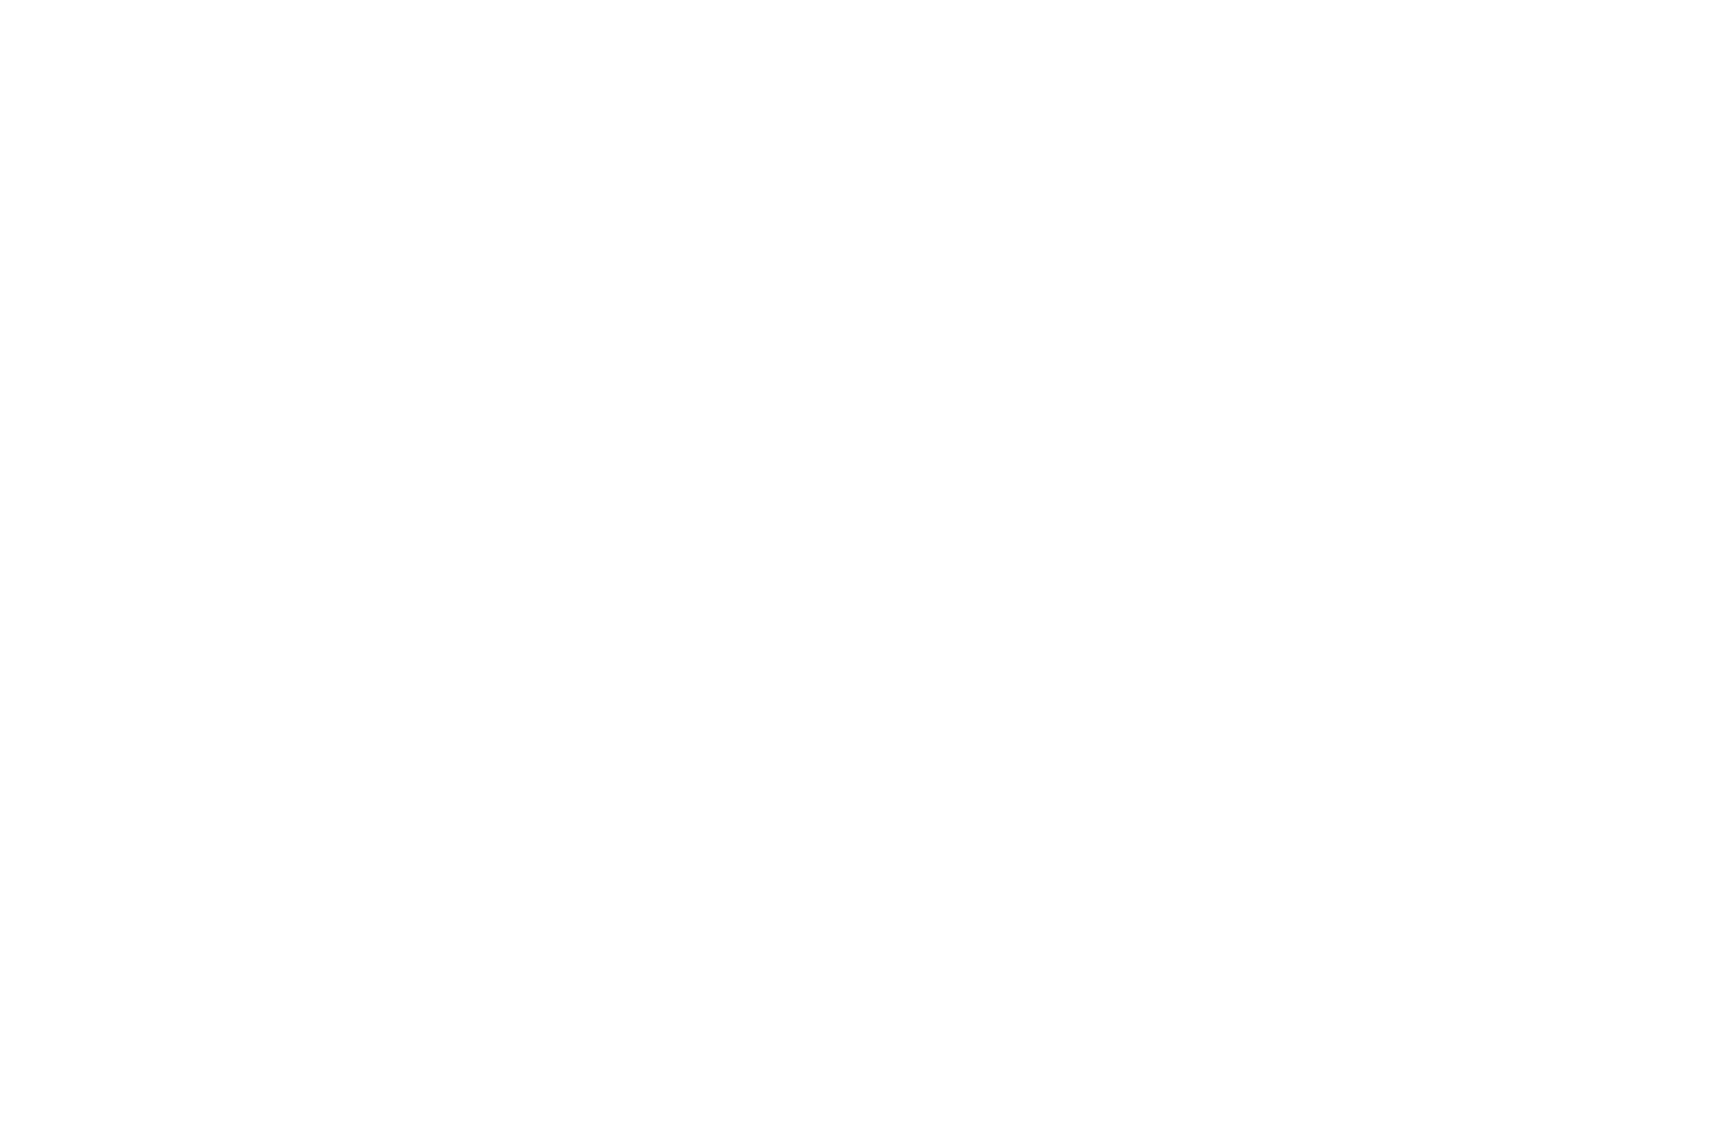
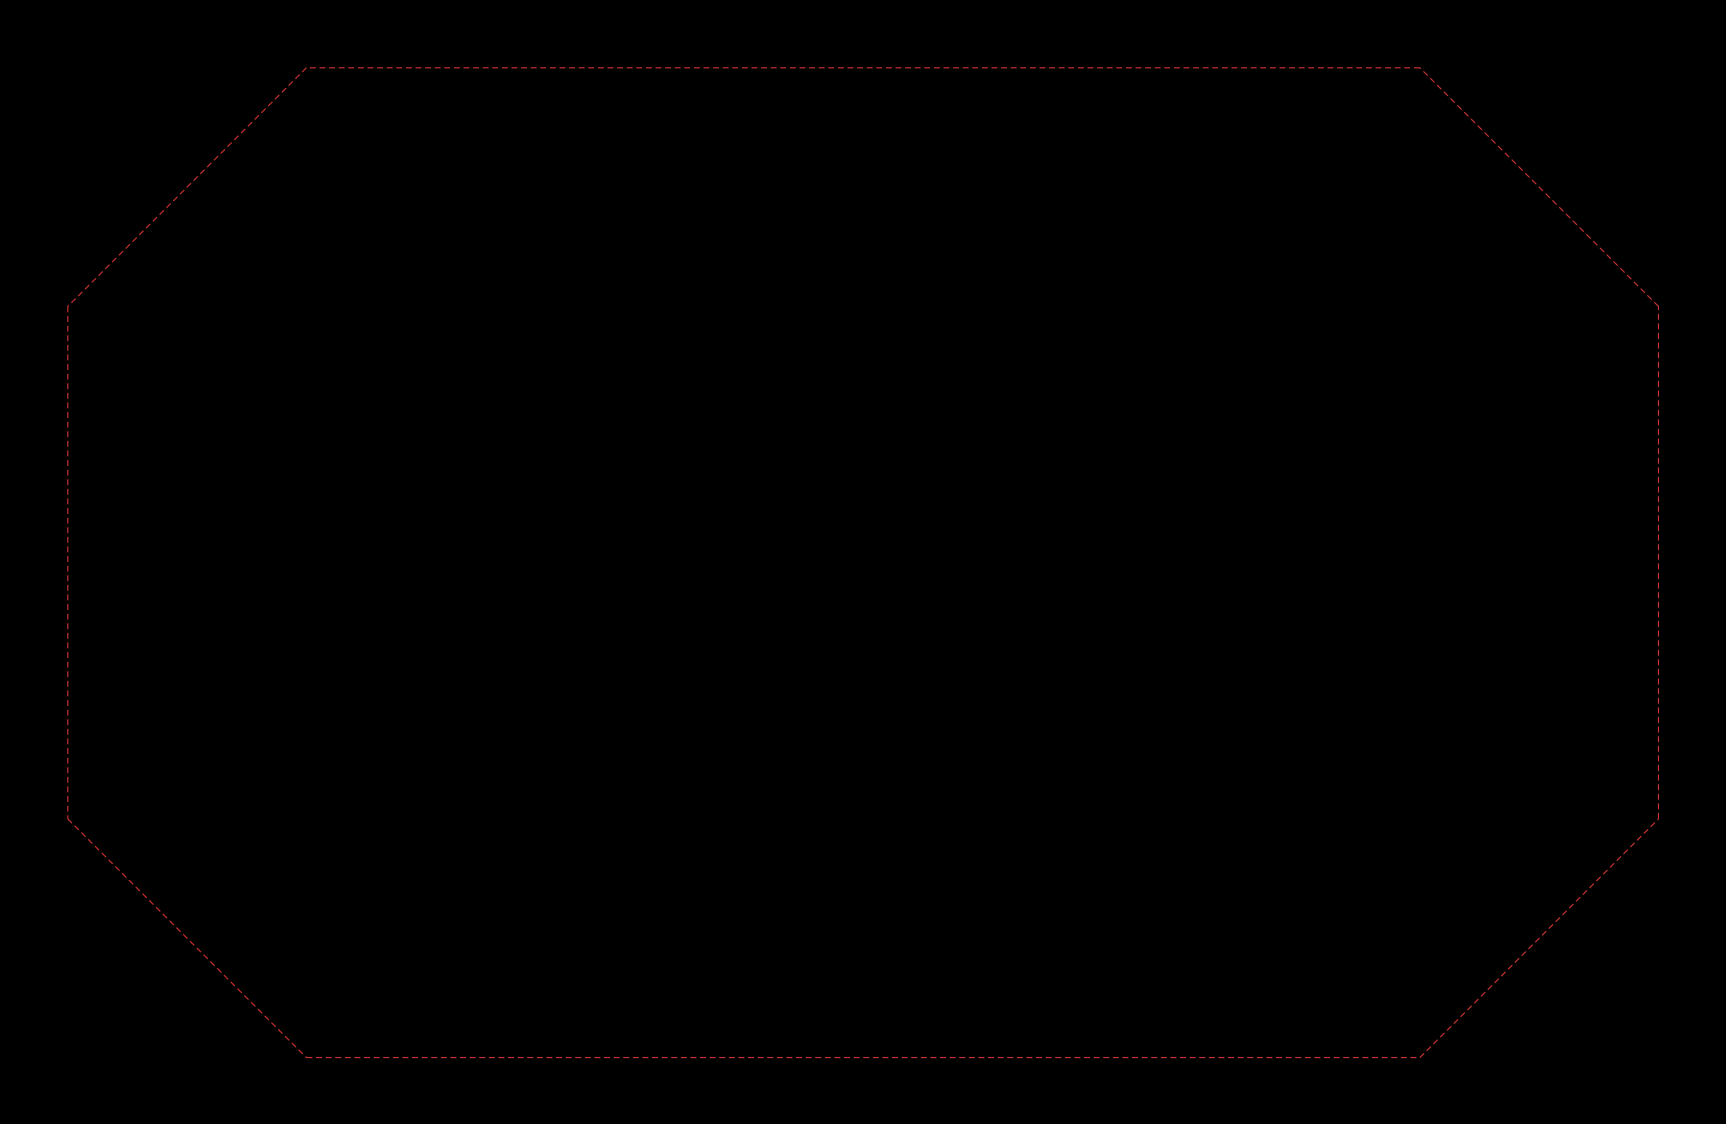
zone outline: none -> (306, 67) (1419, 67) (1658, 306) (1658, 818) (1419, 1057) (306, 1057) (67, 818) (67, 306) (306, 67)

